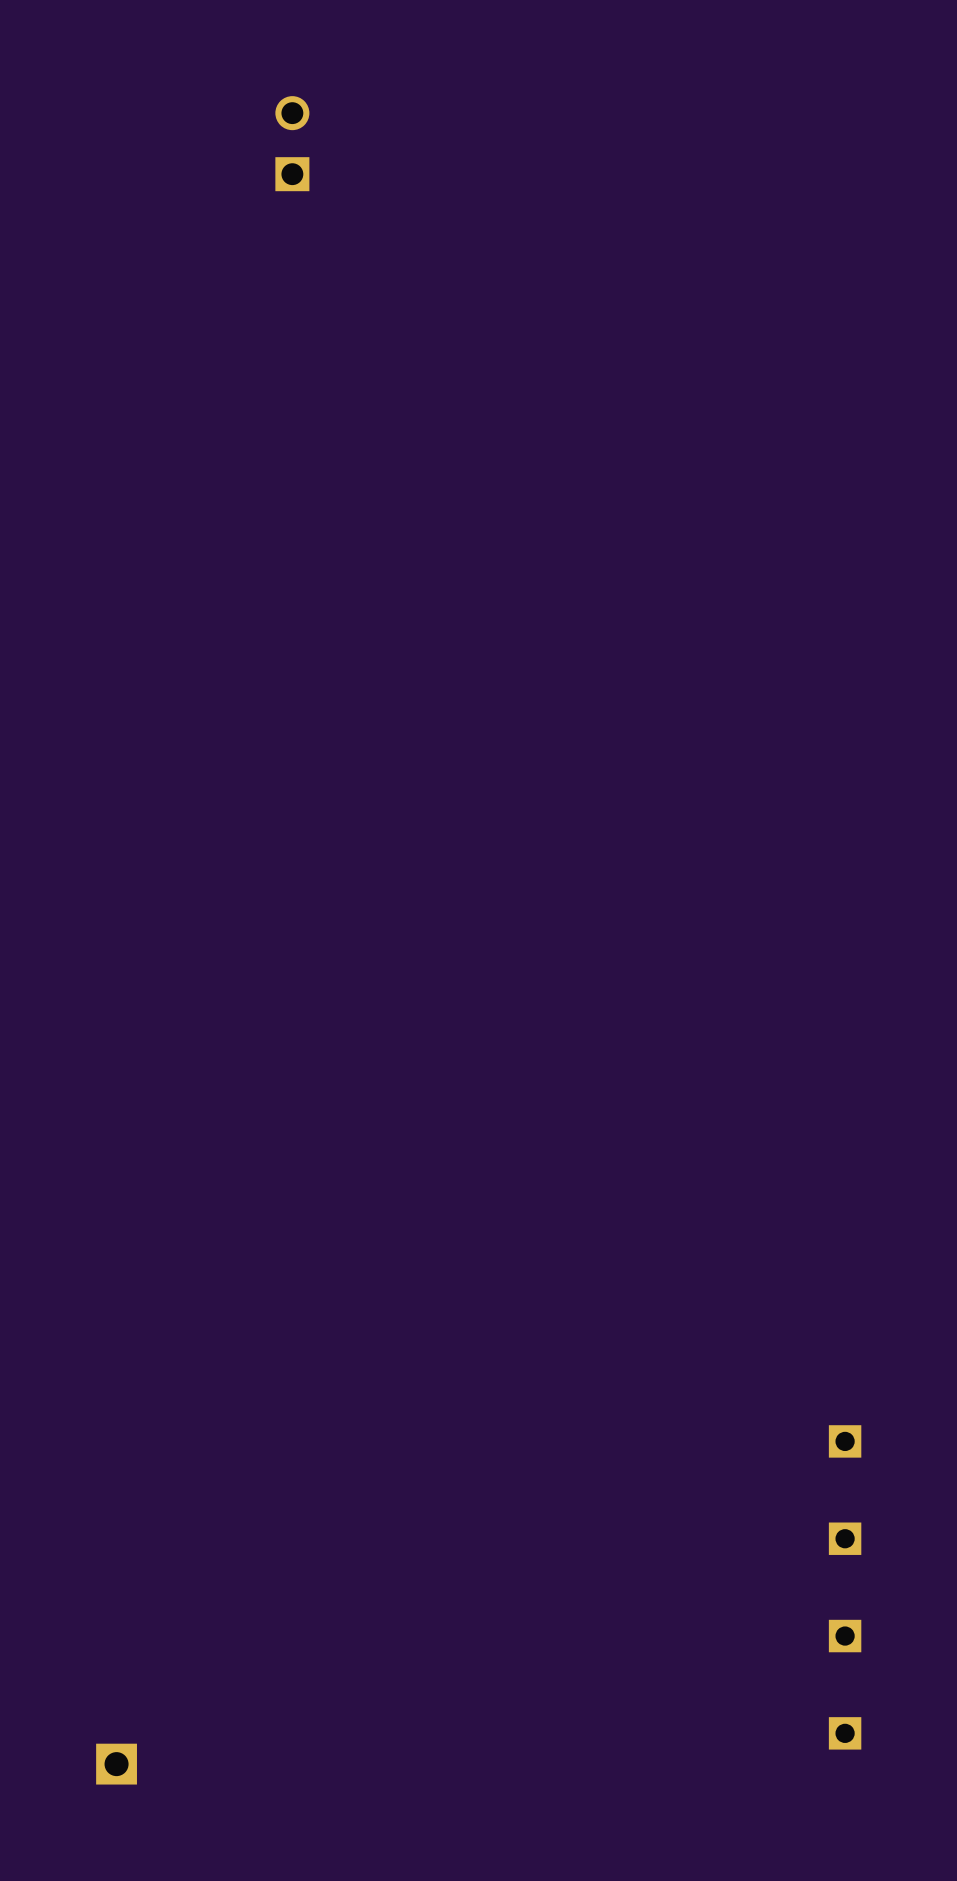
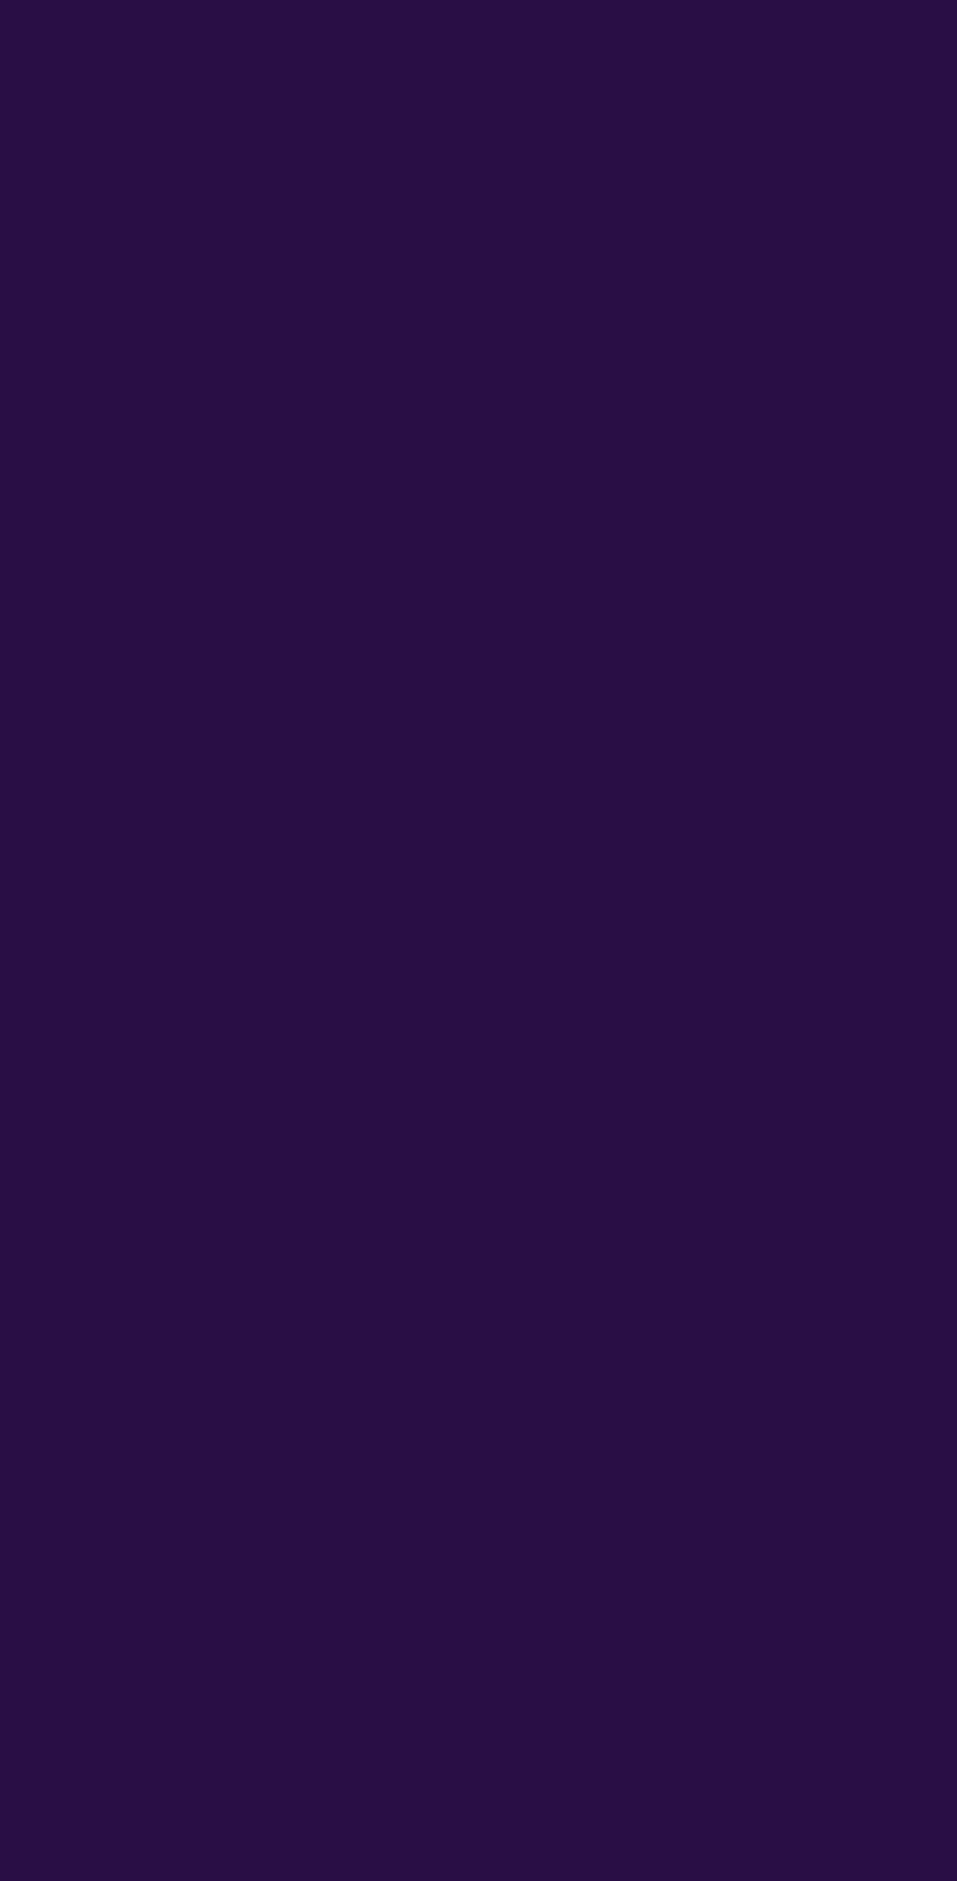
part: (292, 143) -> none
part: (845, 1441) -> none
part: (845, 1538) -> none
part: (845, 1636) -> none
part: (845, 1733) -> none
part: (116, 1764) -> none

